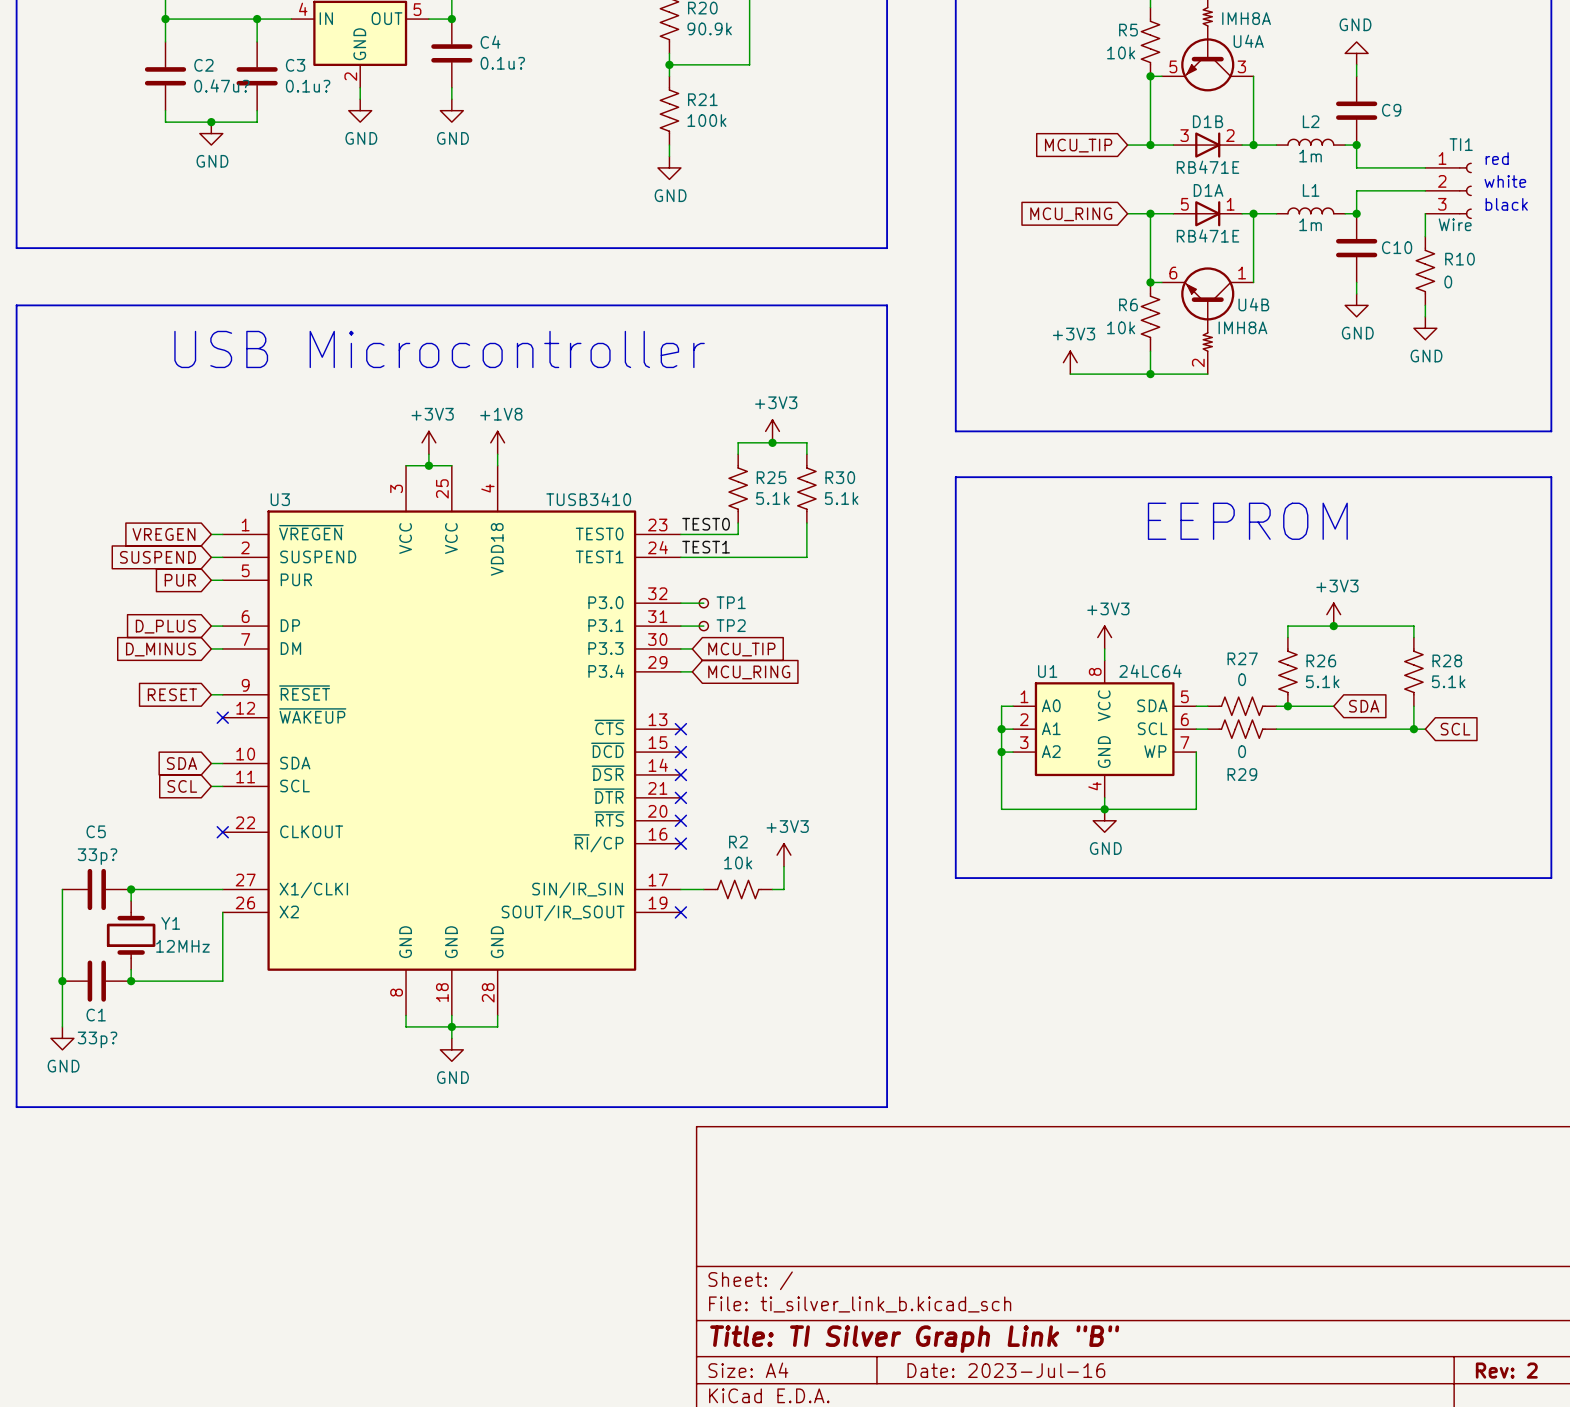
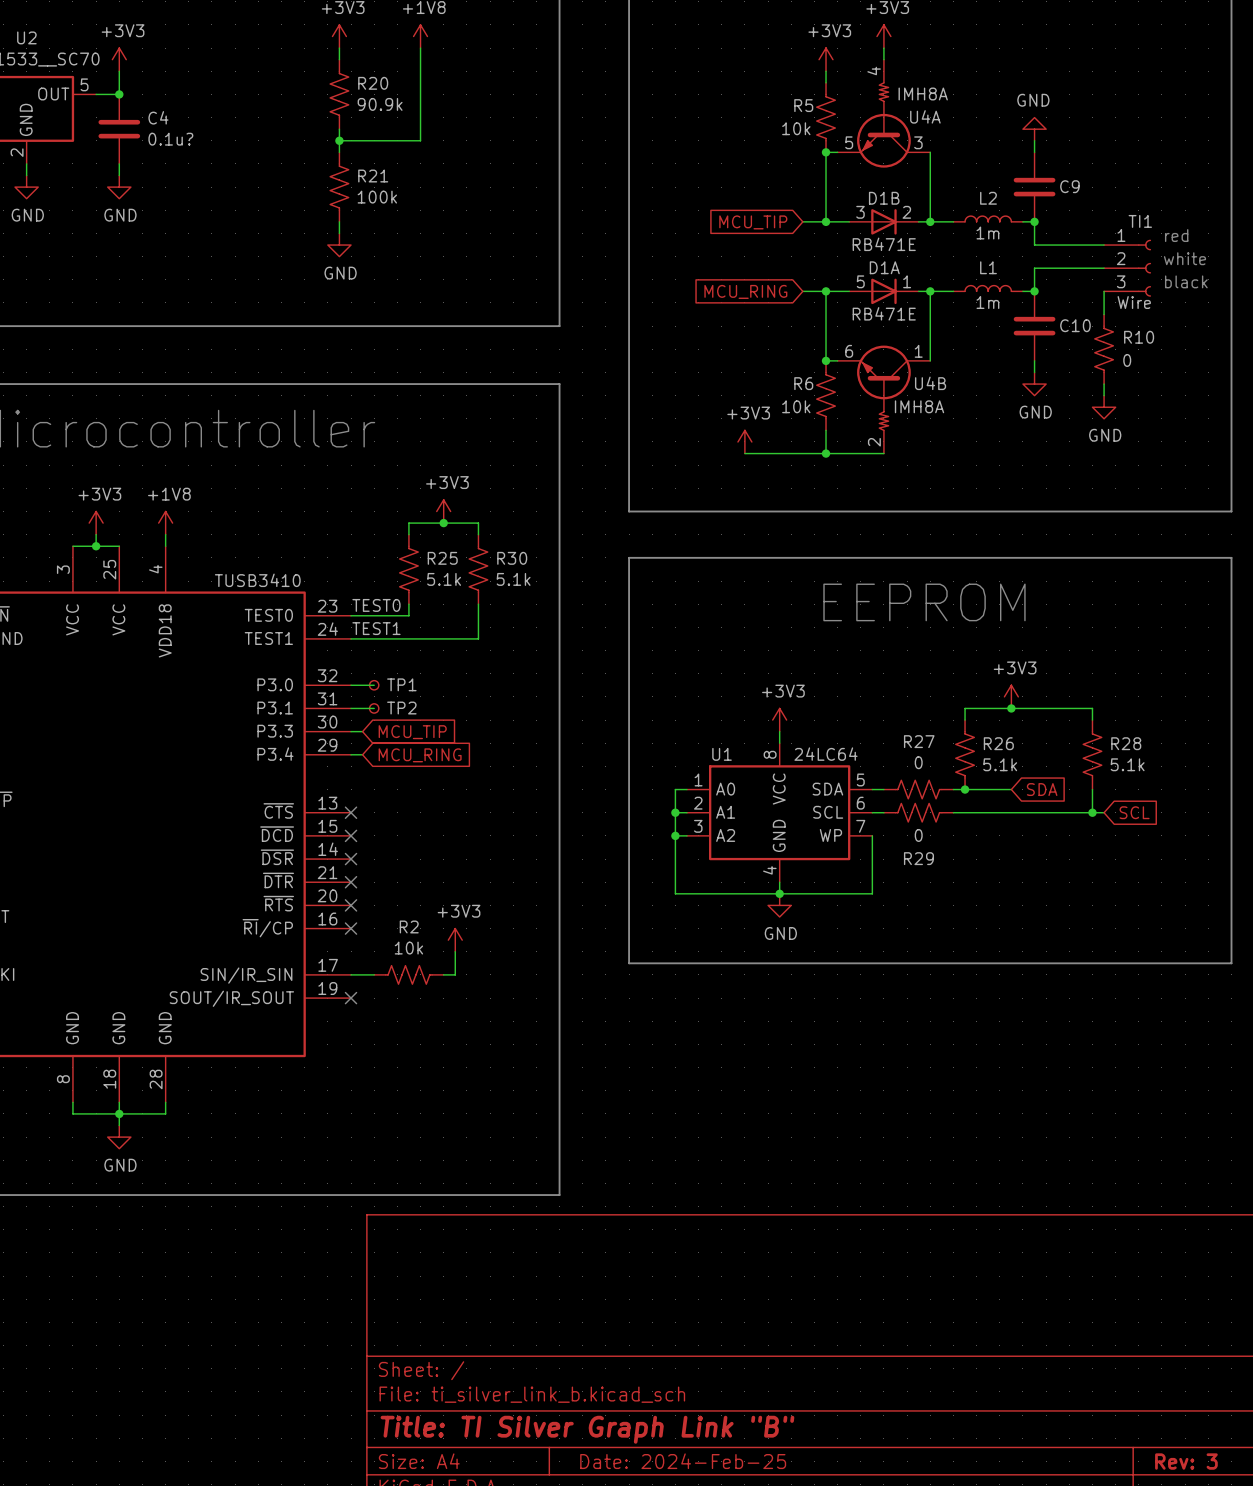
title block: Date: 2023-Jul-16 (1006, 1370) -> Date: 2024-Feb-25 (683, 1461)
title block: Rev: 2 (1506, 1370) -> Rev: 3 (1186, 1461)

